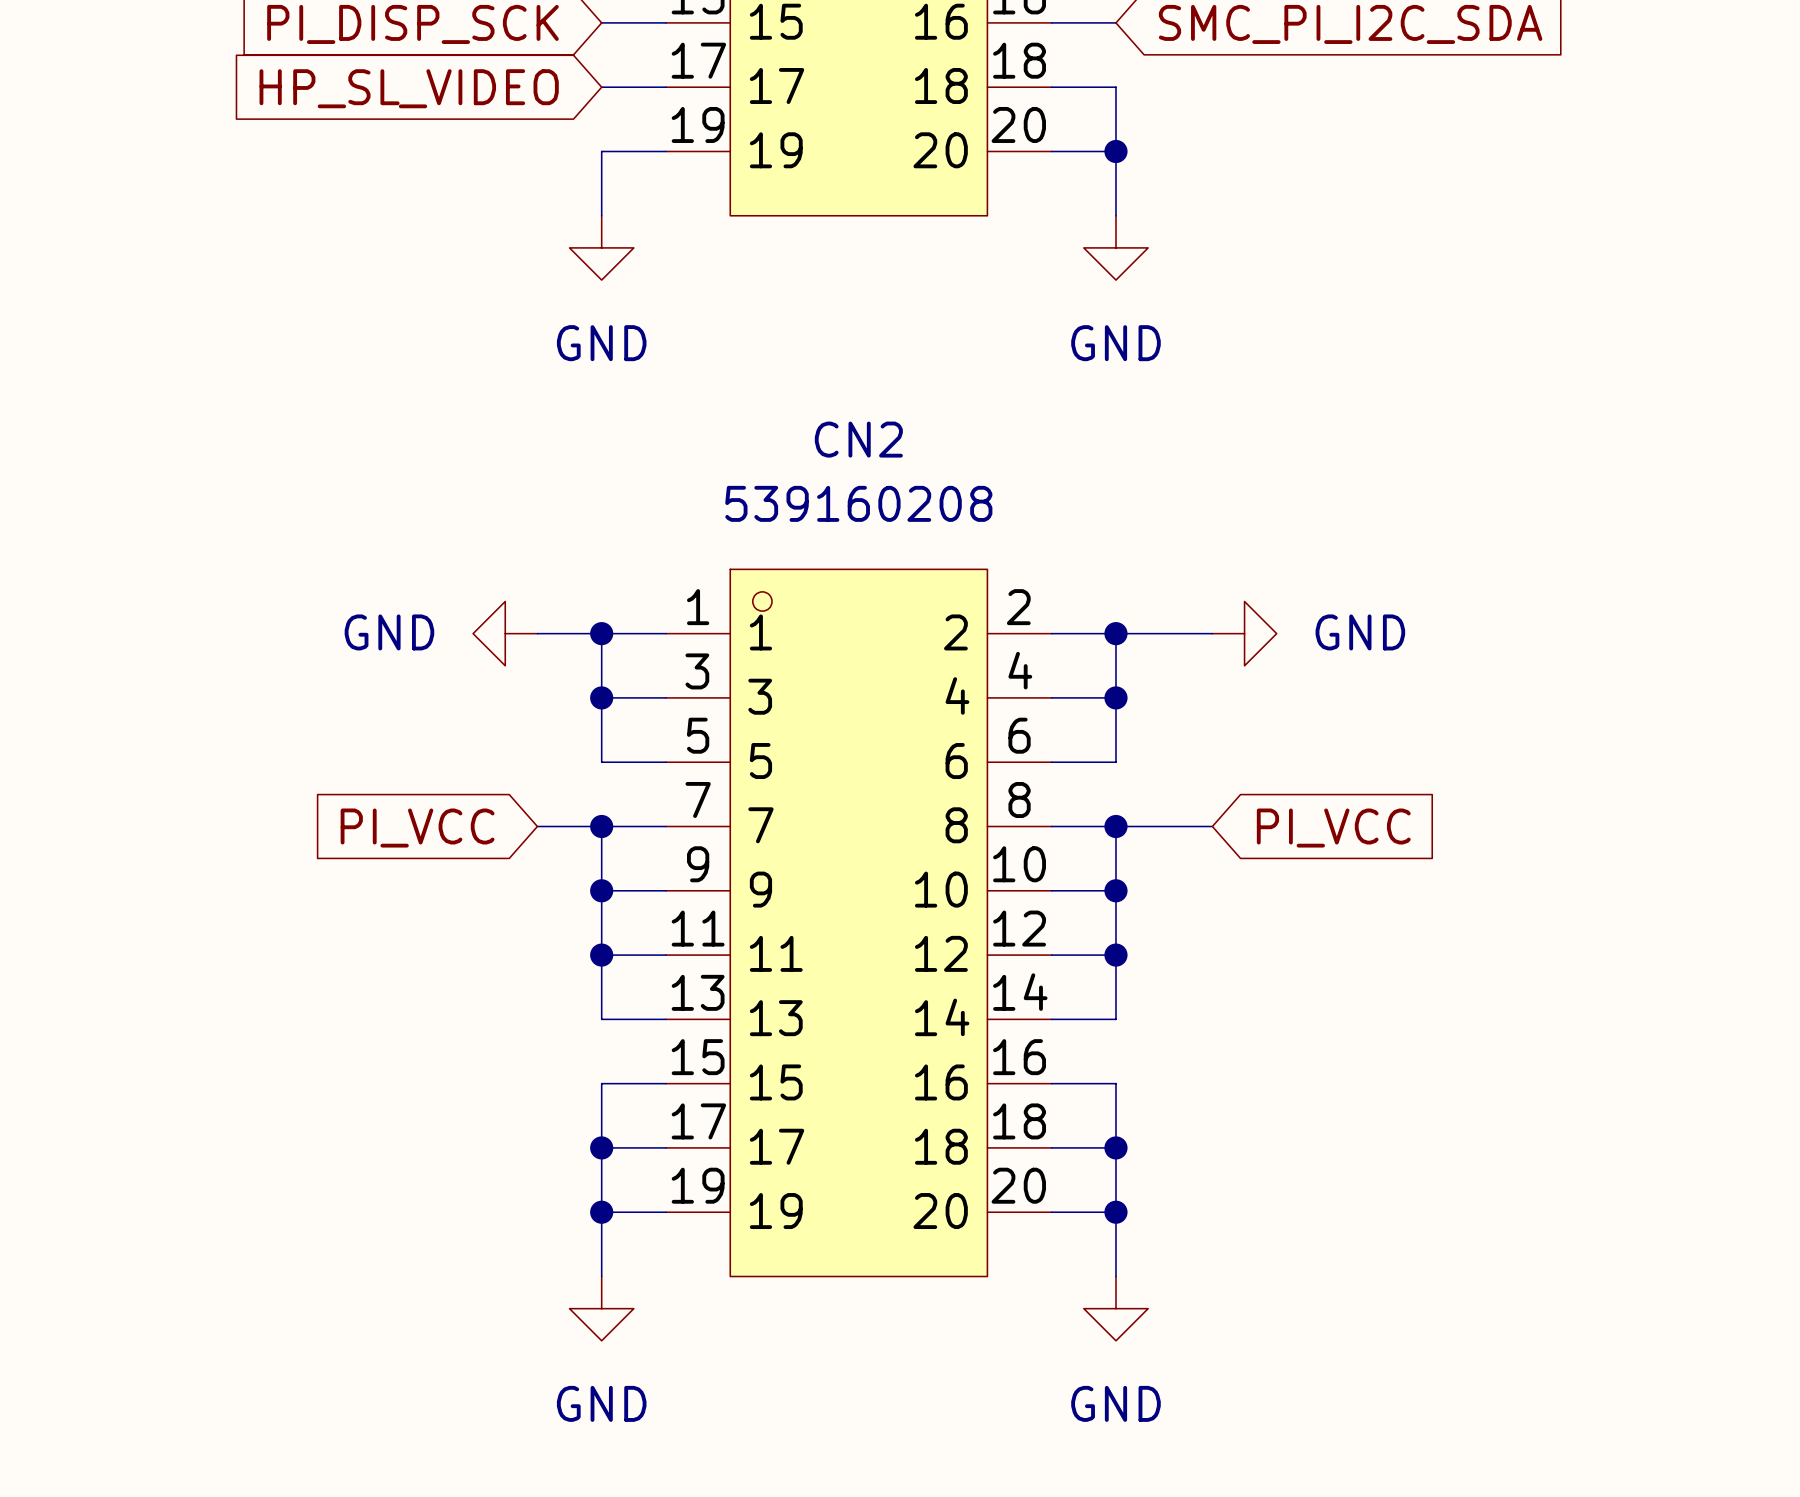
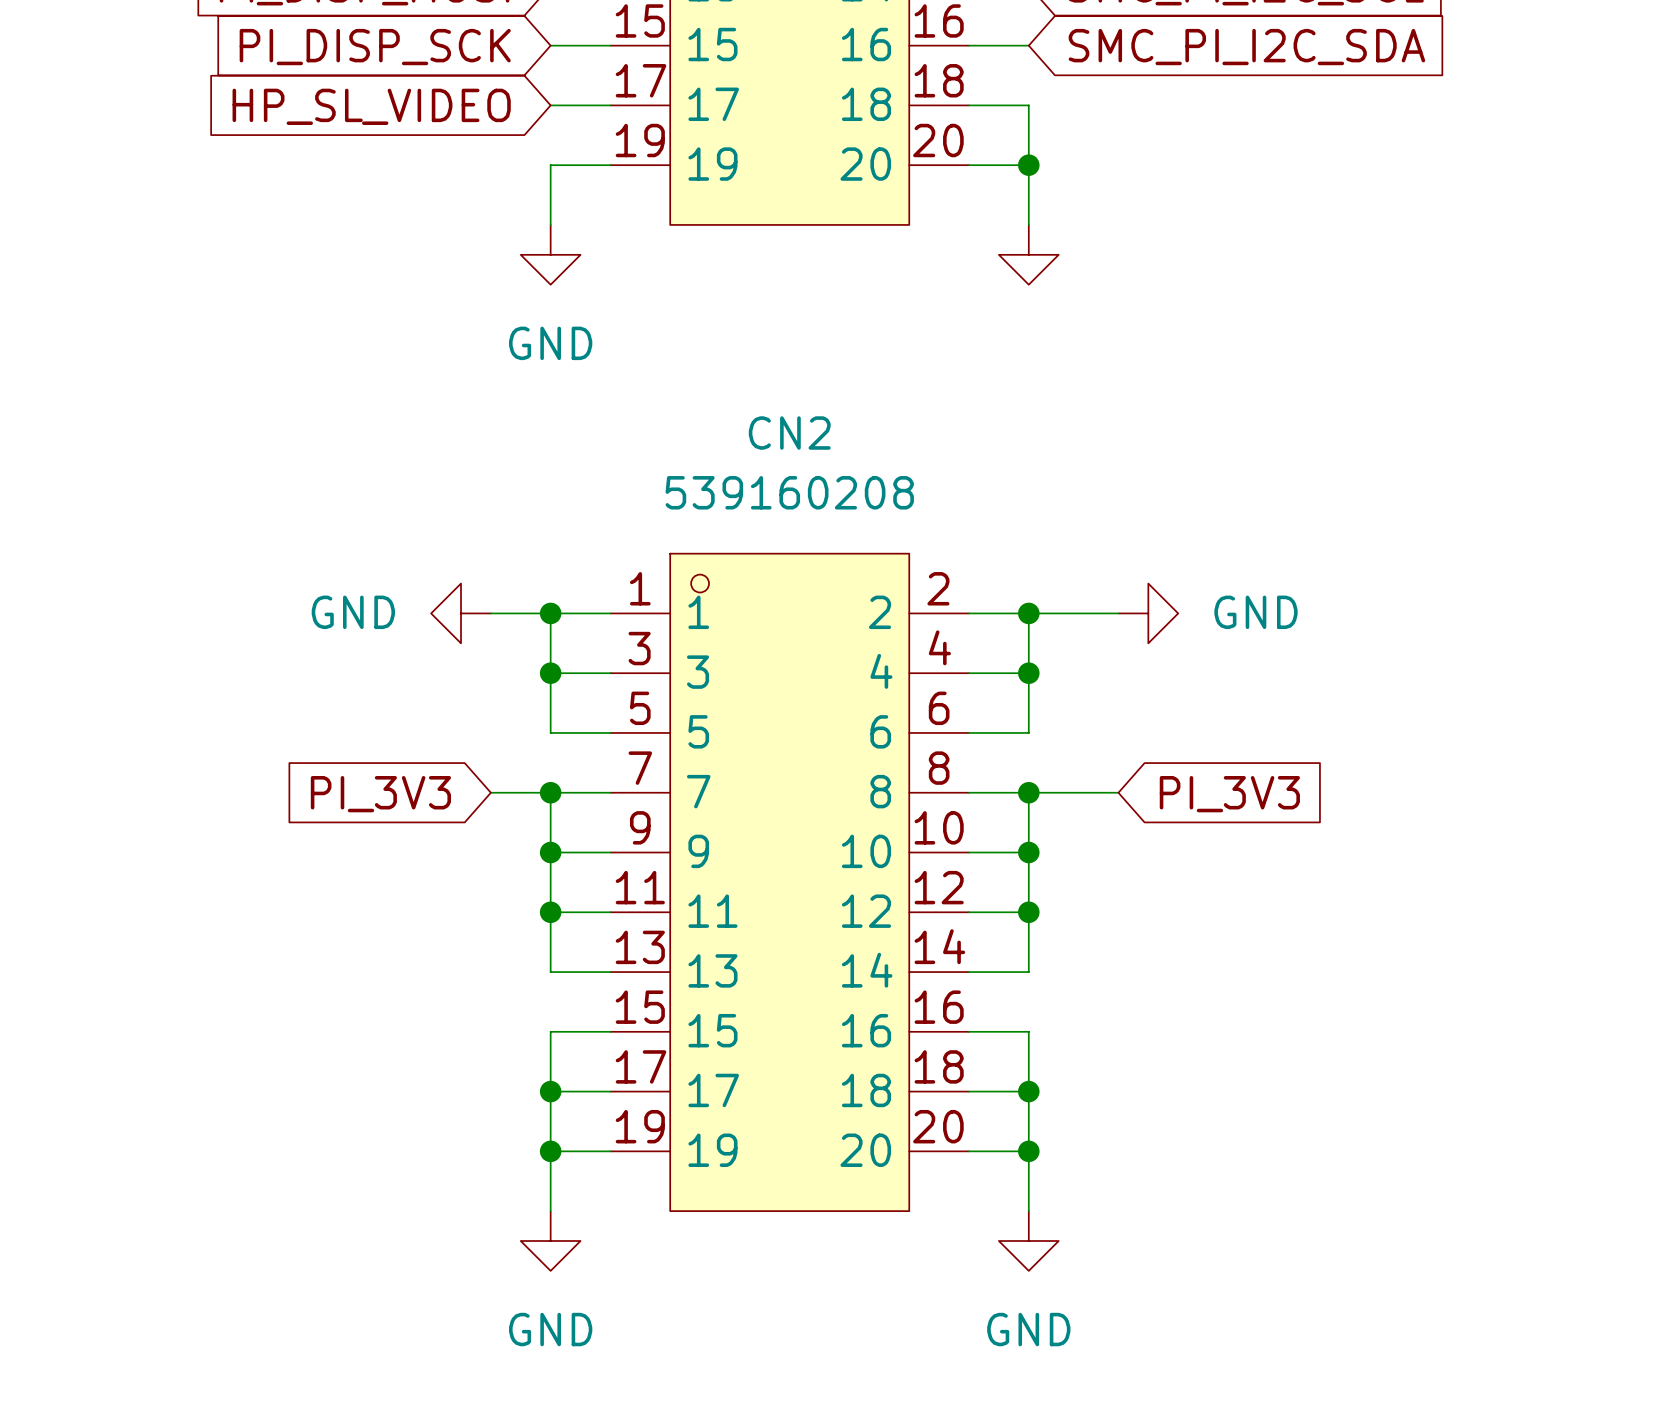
power symbol text: GND (1115, 343) -> none
global label: PI_VCC (417, 828) -> PI_3V3 (380, 794)
global label: PI_VCC (1333, 828) -> PI_3V3 (1229, 794)

